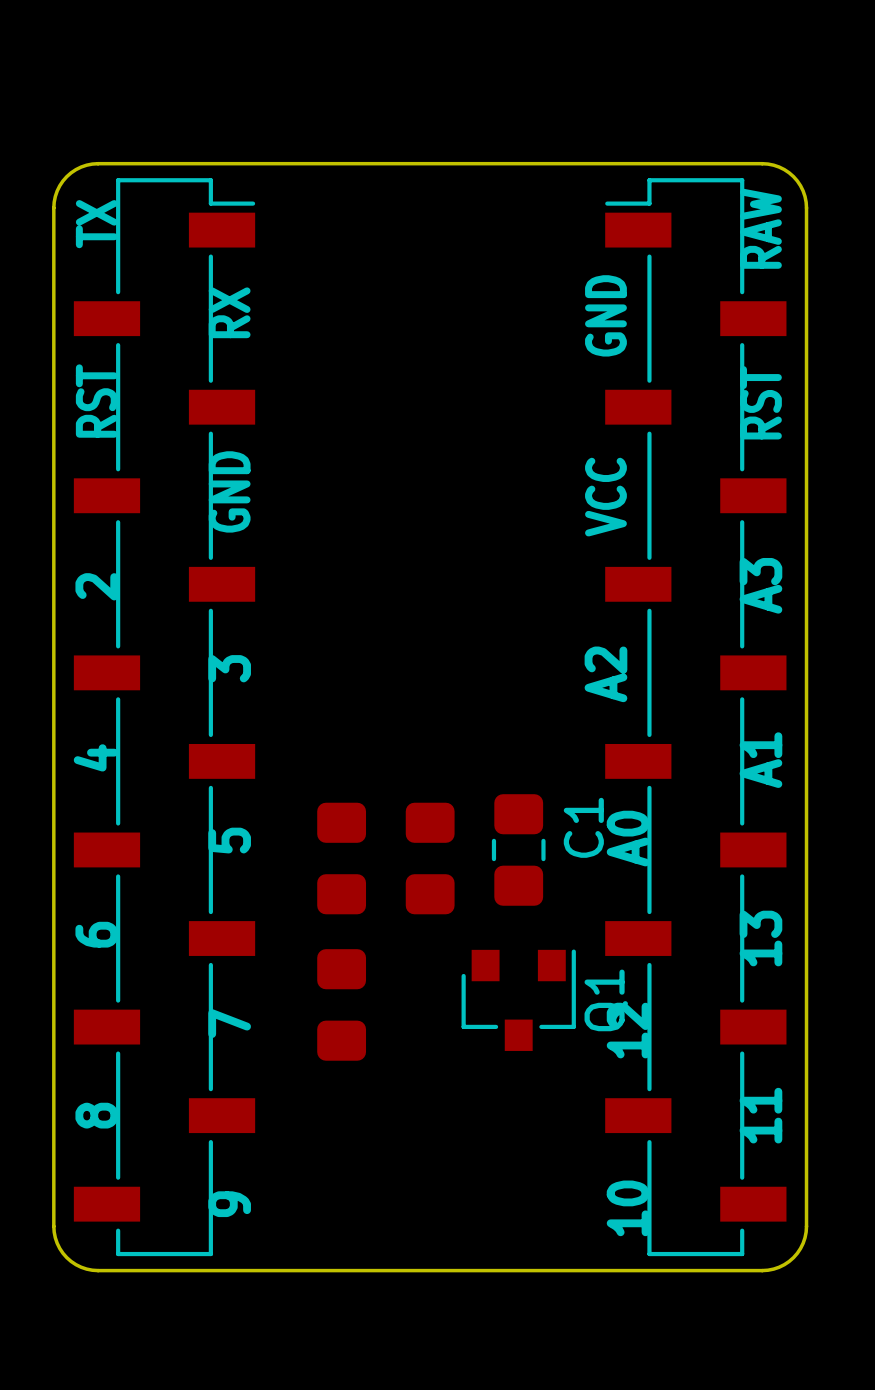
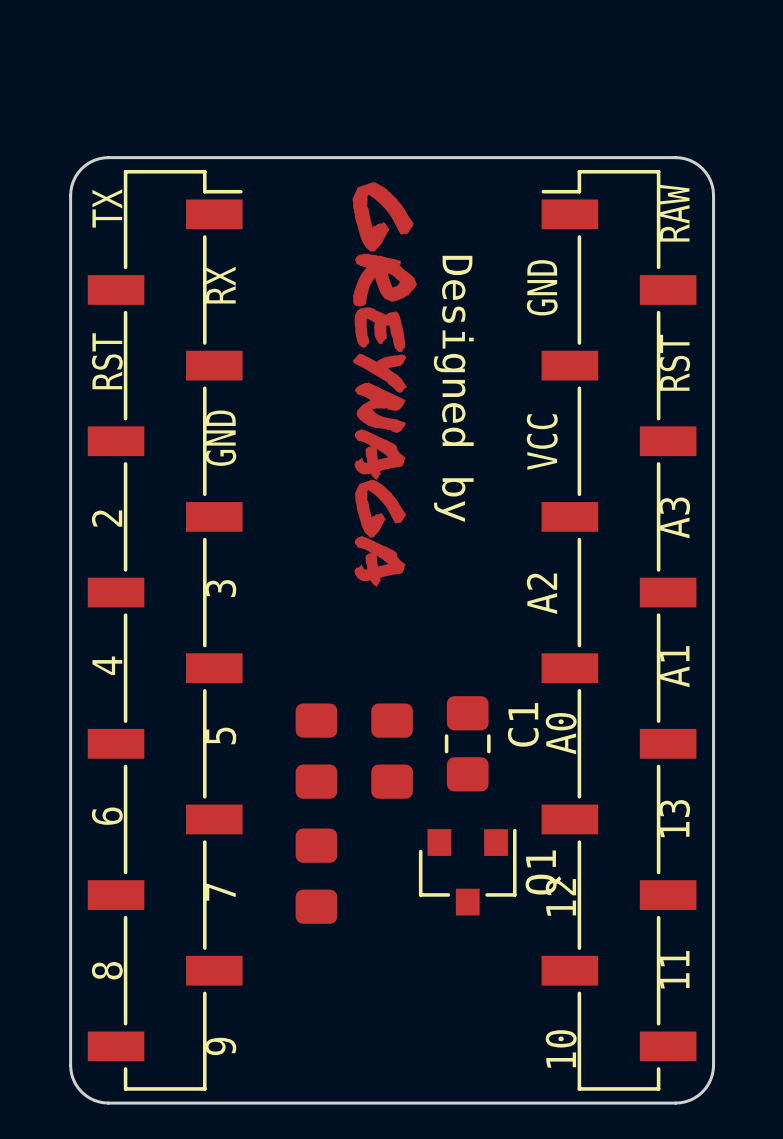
drawing: none -> [352, 182, 417, 587]
text: none -> Designed by (453, 388)

